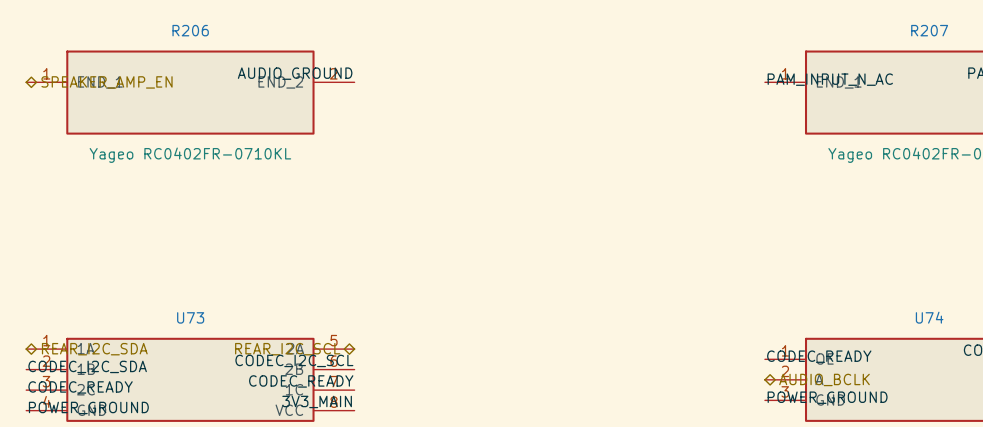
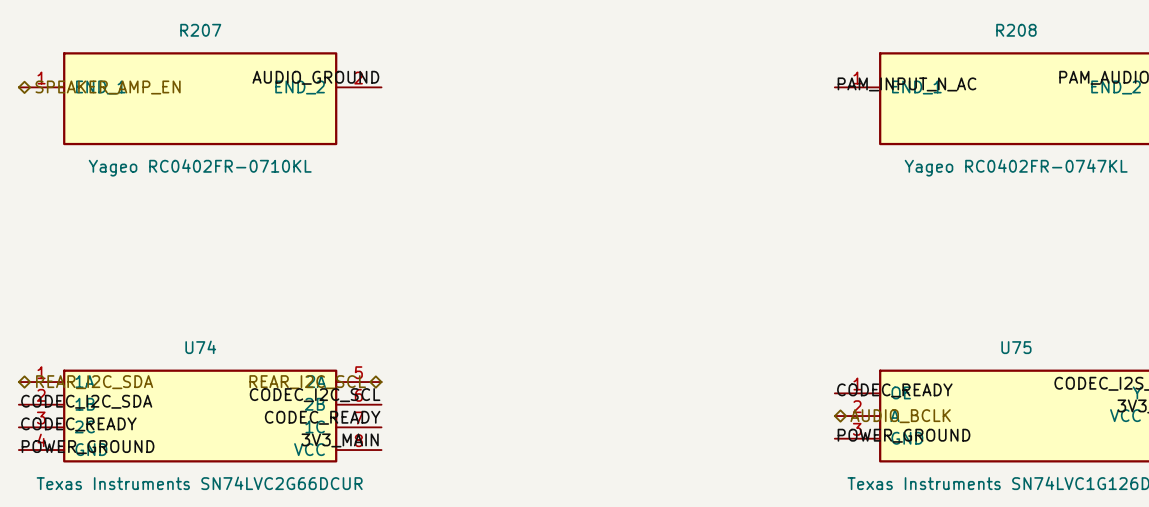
R206 name: R206 (190, 30) -> R207 (200, 30)
R207 name: R207 (929, 30) -> R208 (1016, 30)
U73 name: U73 (190, 317) -> U74 (200, 347)
U74 name: U74 (929, 317) -> U75 (1016, 347)

